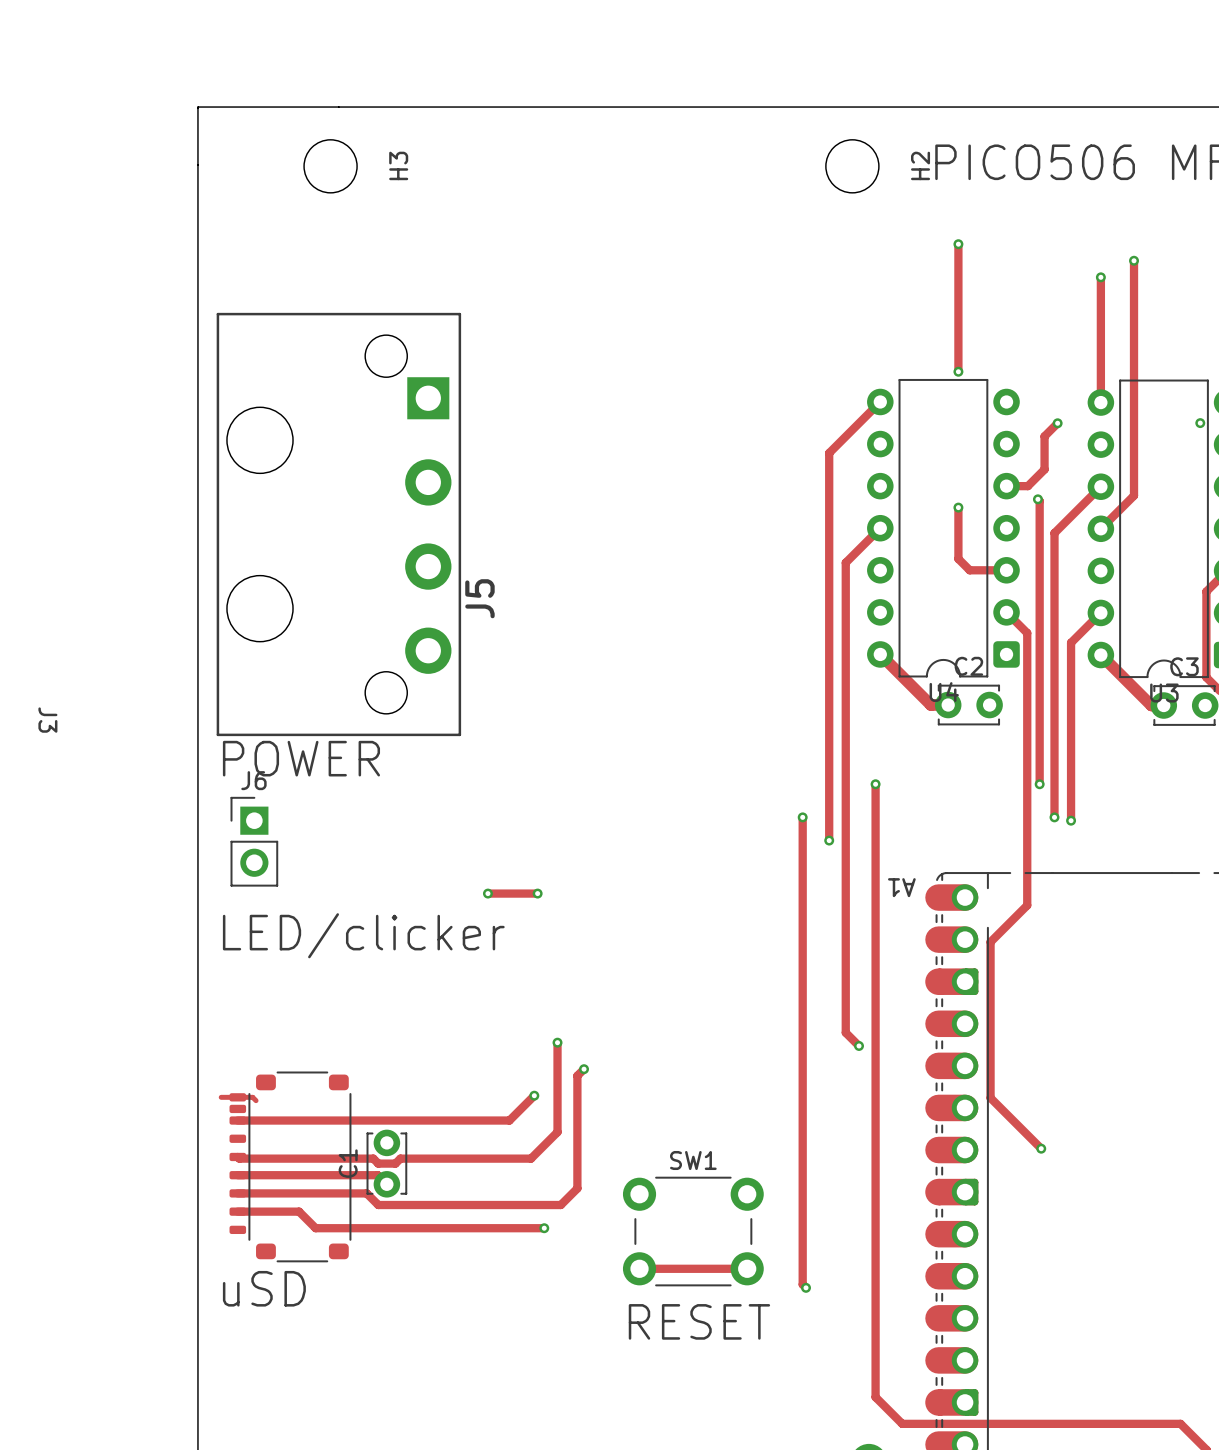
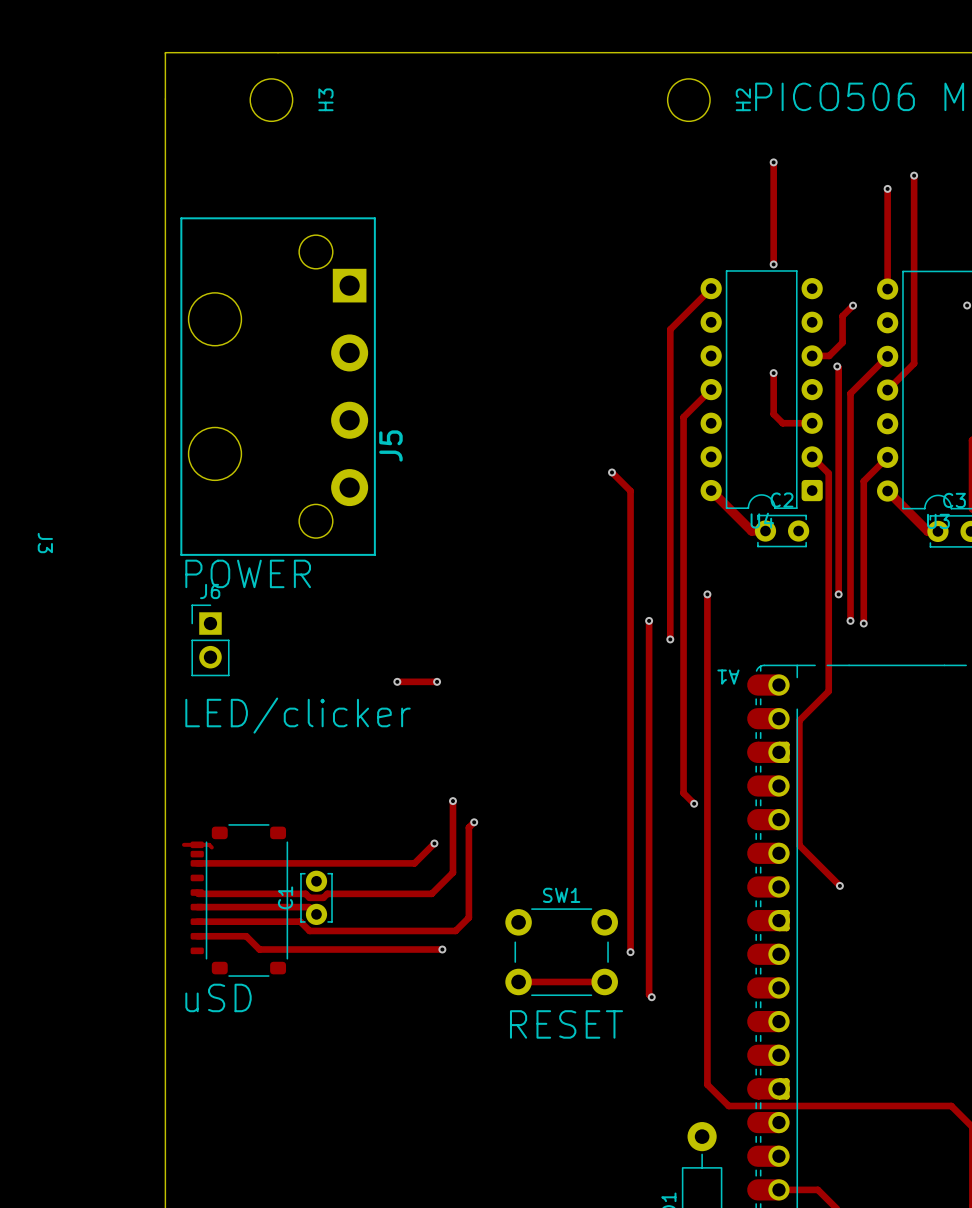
track: none -> (612, 472) (630, 491) (630, 952)
via: none -> (612, 472)
via: none -> (630, 952)

